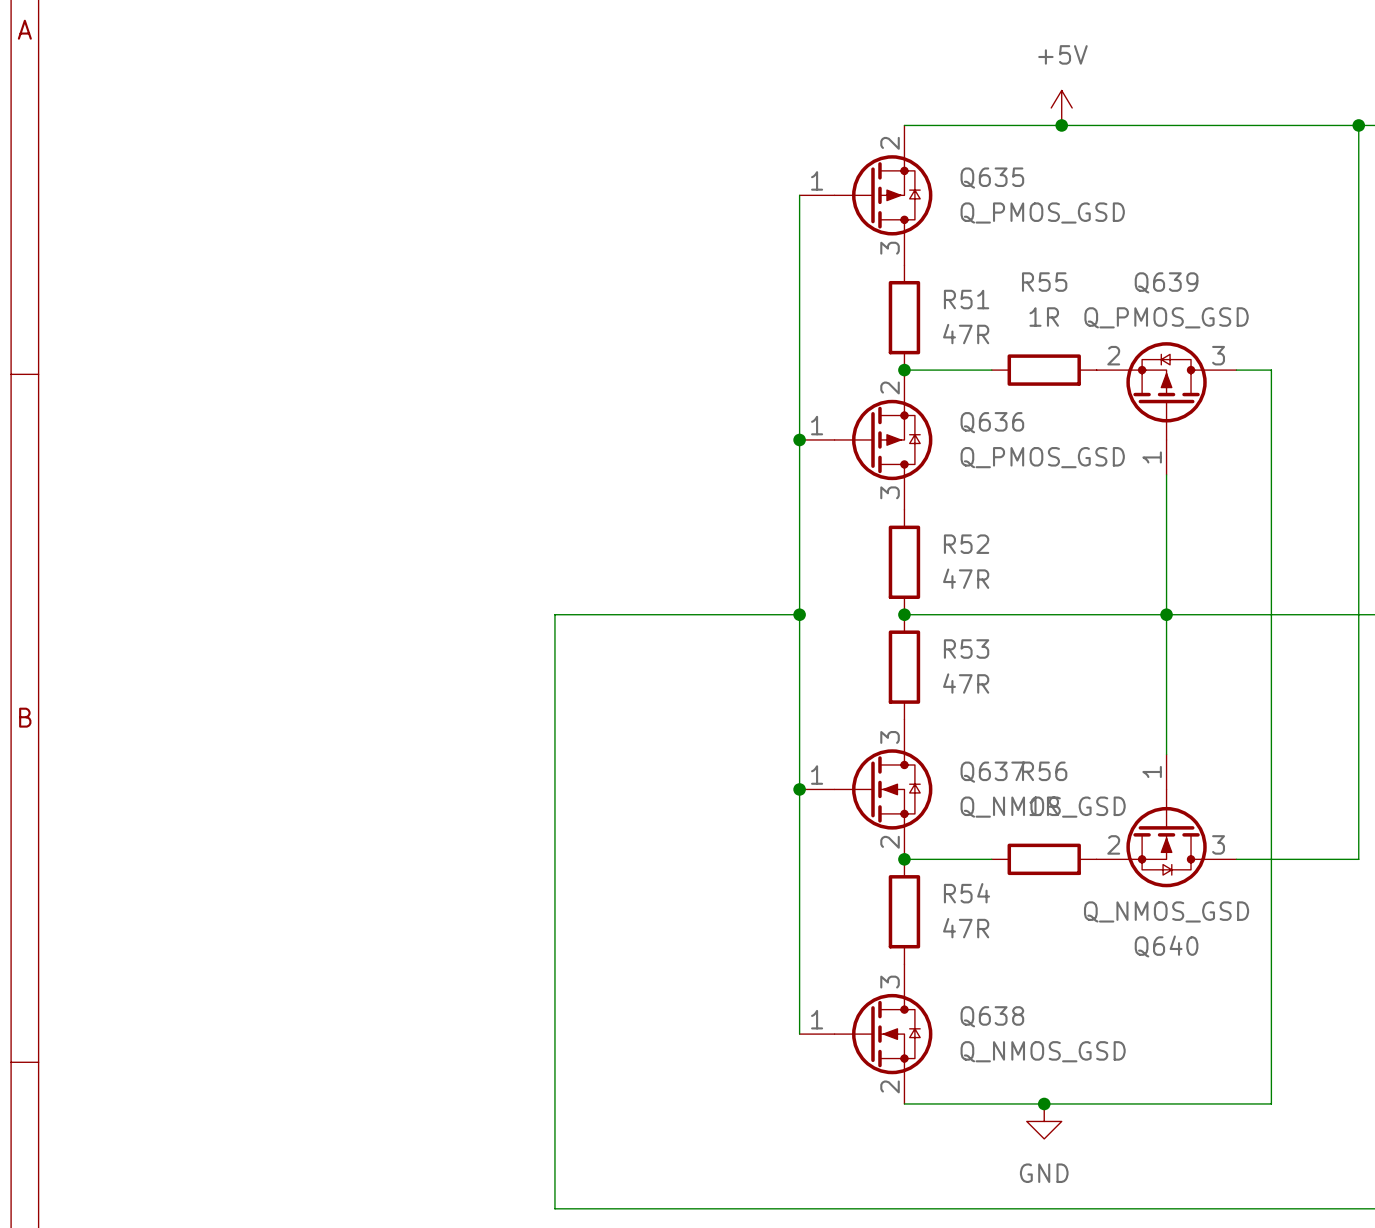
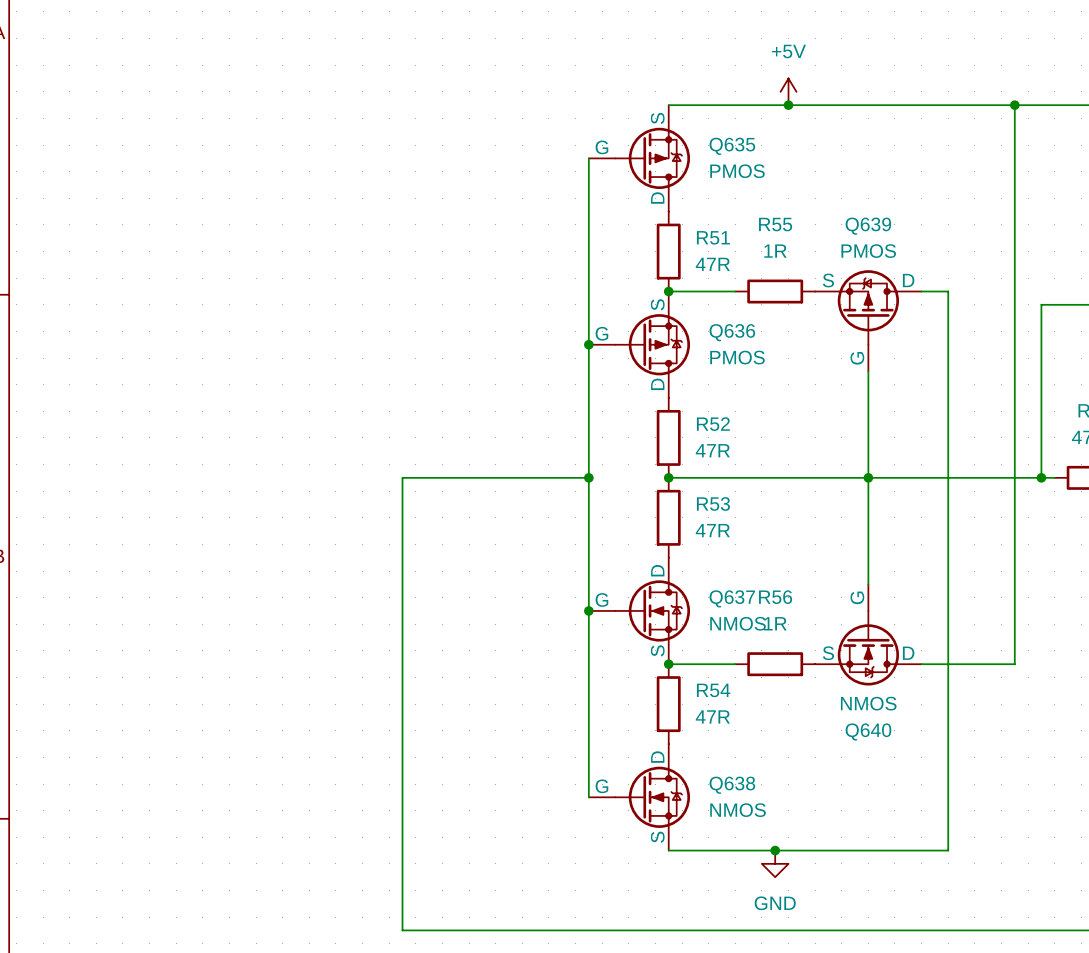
Q635 symbol: [799, 125, 933, 266] -> [588, 105, 691, 212]
Q635 value: Q_PMOS_GSD (1042, 213) -> PMOS (737, 171)
Q639 value: Q_PMOS_GSD (1166, 317) -> PMOS (868, 251)
Q639 symbol: [1096, 342, 1237, 475] -> [815, 270, 922, 372]
Q636 symbol: [799, 370, 933, 510] -> [588, 291, 691, 398]
Q636 value: Q_PMOS_GSD (1042, 457) -> PMOS (737, 357)
Q637 symbol: [799, 719, 933, 860] -> [588, 557, 691, 665]
Q640 symbol: [1096, 754, 1237, 888] -> [815, 584, 922, 686]
Q637 value: Q_NMOS_GSD (1043, 807) -> NMOS (738, 623)
Q640 value: Q_NMOS_GSD (1166, 911) -> NMOS (868, 703)
Q638 symbol: [799, 964, 933, 1104] -> [588, 744, 691, 851]
Q638 value: Q_NMOS_GSD (1043, 1051) -> NMOS (738, 810)

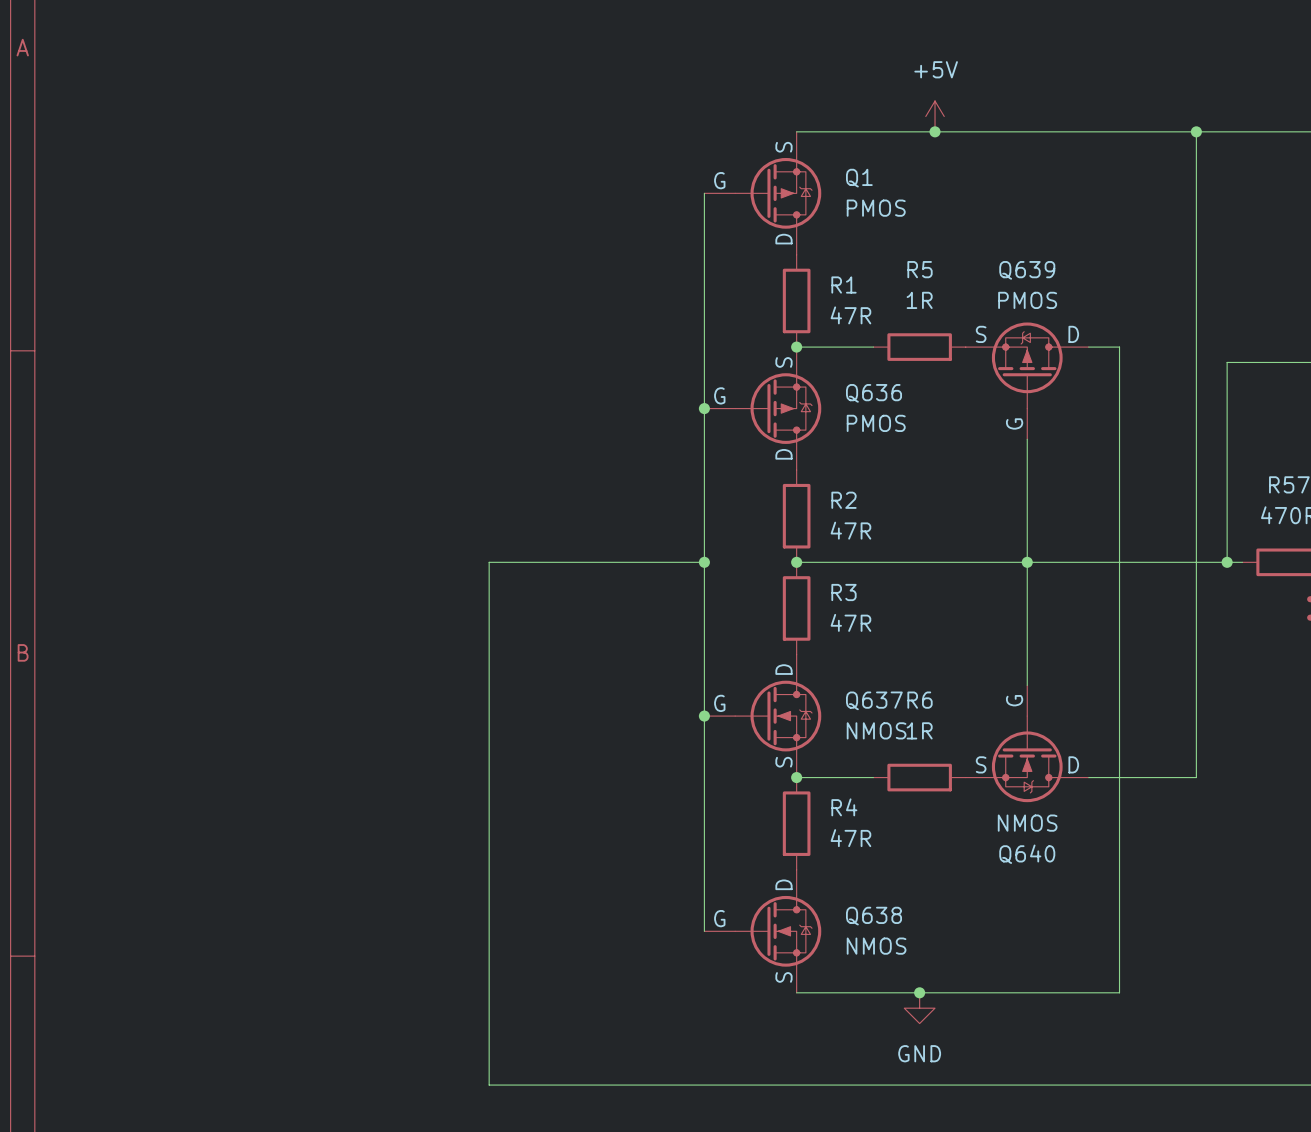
Q635 name: Q635 (732, 146) -> Q1 (859, 178)
R55 name: R55 (775, 224) -> R5 (920, 269)
R51 name: R51 (713, 237) -> R1 (843, 285)
R52 name: R52 (713, 424) -> R2 (843, 500)
R53 name: R53 (713, 503) -> R3 (843, 592)
R56 name: R56 (775, 597) -> R6 (920, 700)
R54 name: R54 (713, 690) -> R4 (844, 807)

